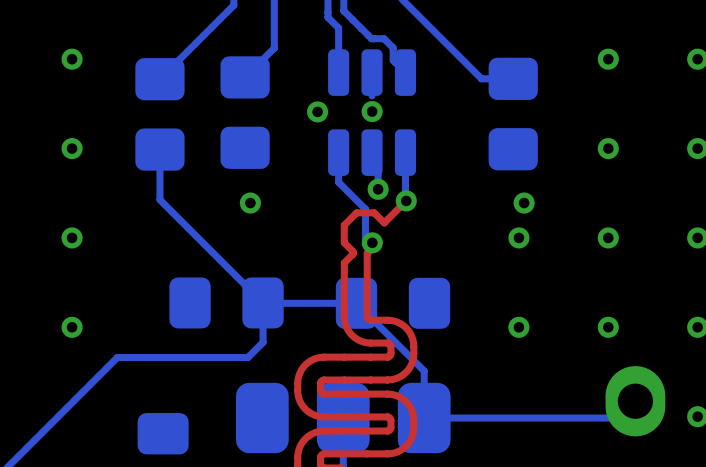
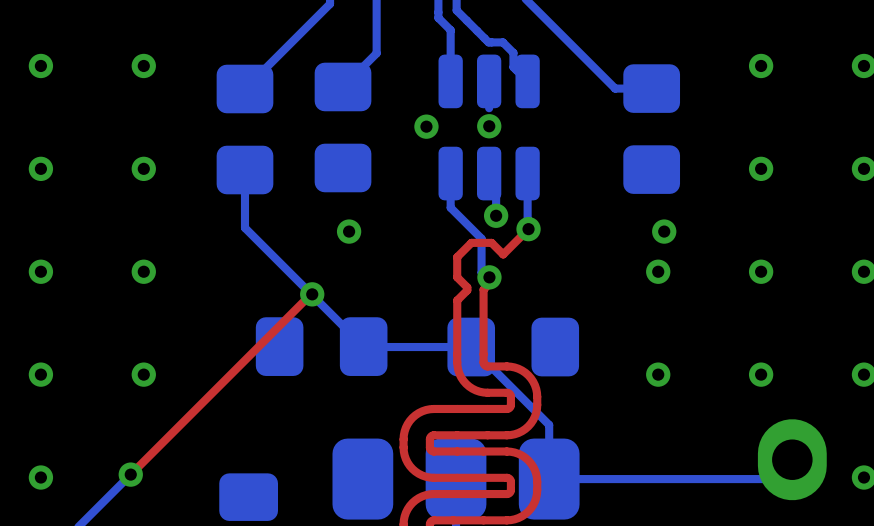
top track: none -> (312, 294) (130, 474)
via: none -> (312, 294)
bottom track: (263, 302) (263, 342) (247, 357) (117, 357) (60, 414) -> none
via: none -> (130, 474)

